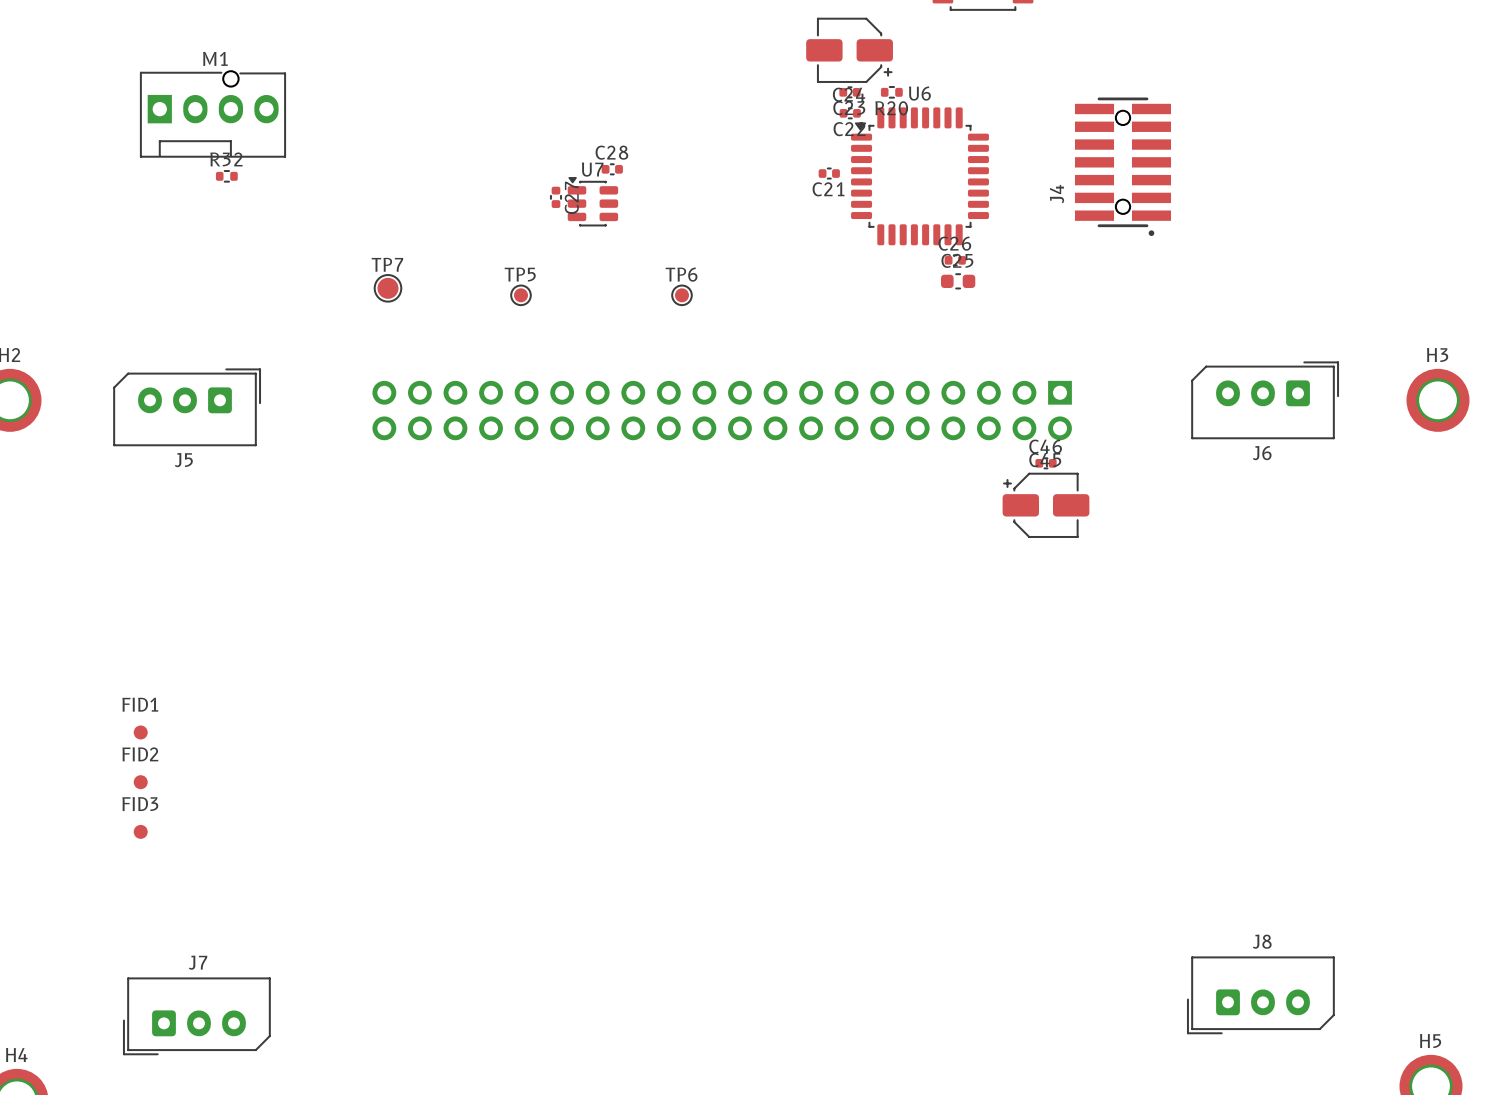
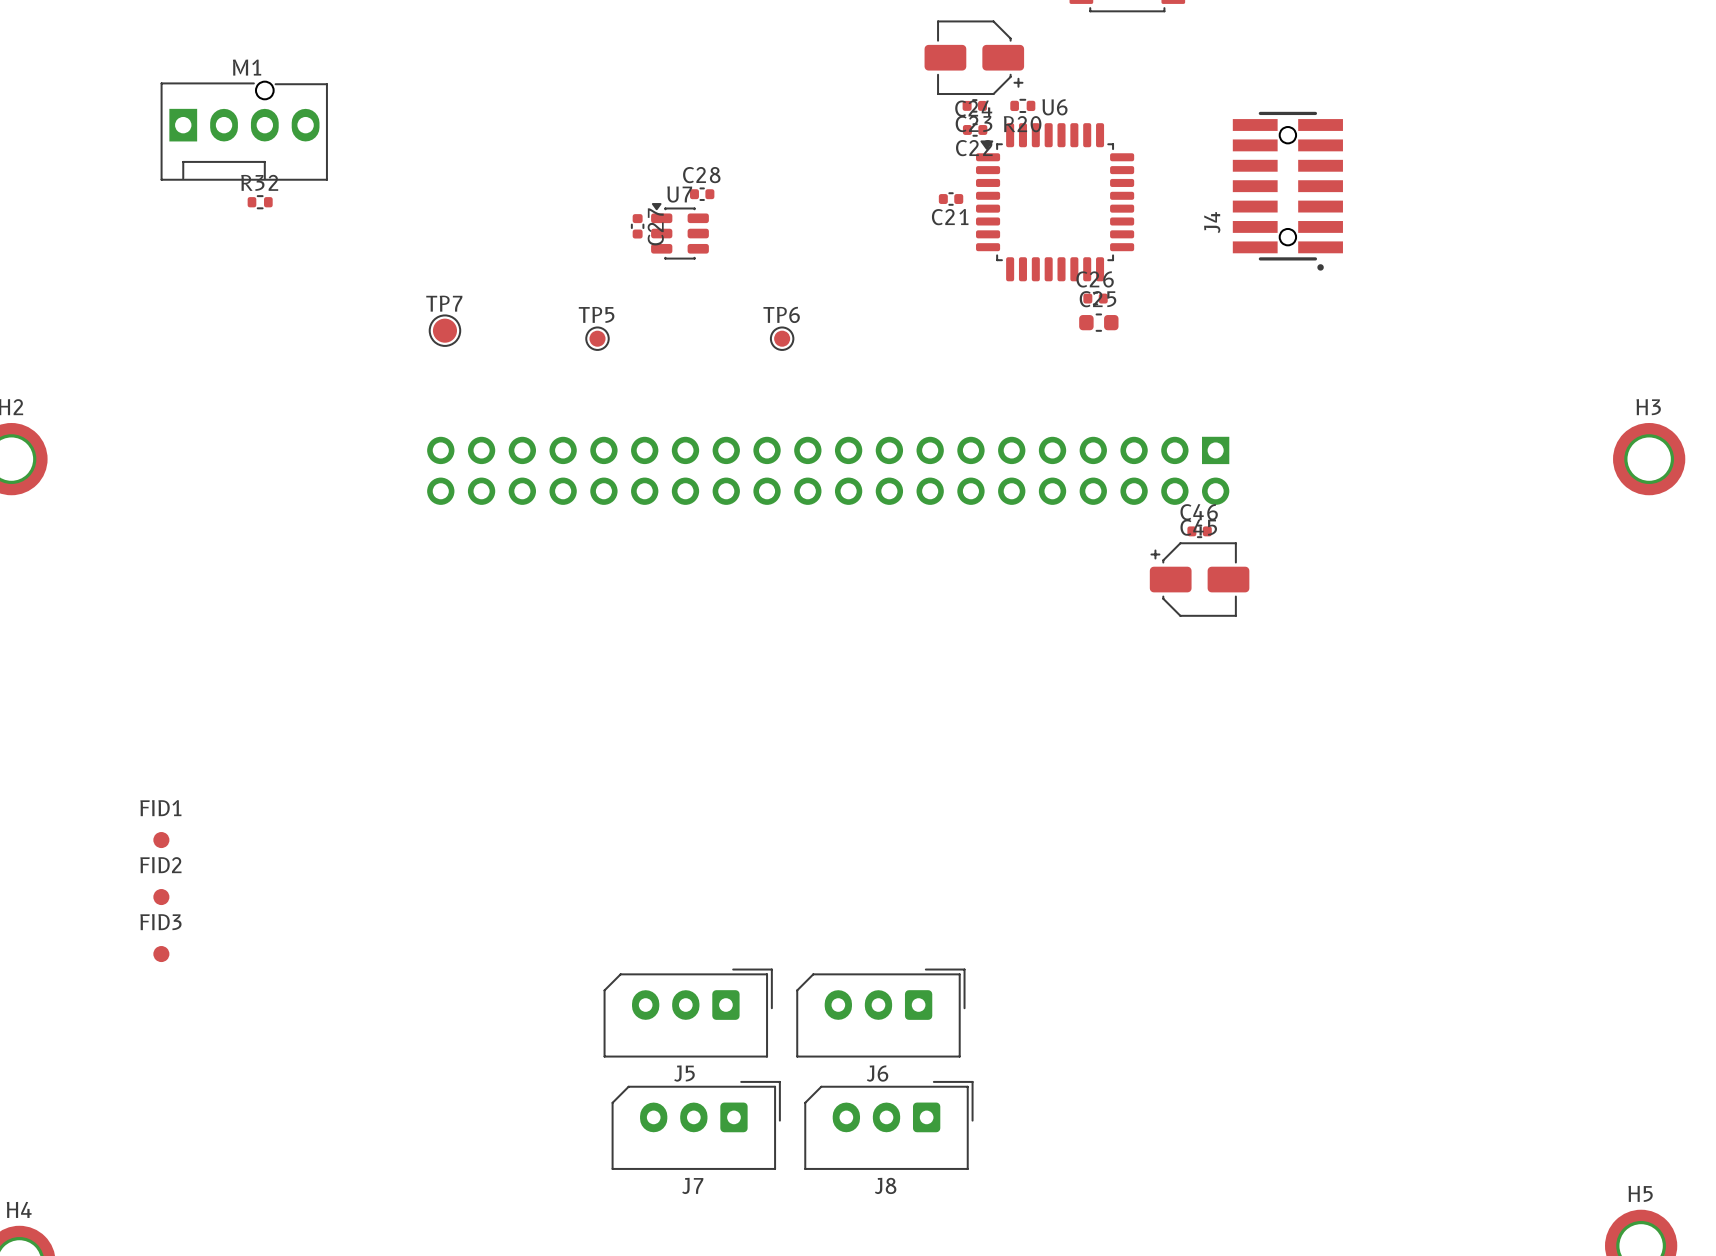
J6 position: (1265, 400) -> (880, 1013)
J5 position: (187, 407) -> (688, 1013)
J8 rotation: 0° (1260, 995) -> 180° (888, 1125)
J8 position: (1260, 995) -> (888, 1125)
J7 rotation: 0° (196, 1016) -> 180° (696, 1125)
J7 position: (196, 1016) -> (696, 1125)

